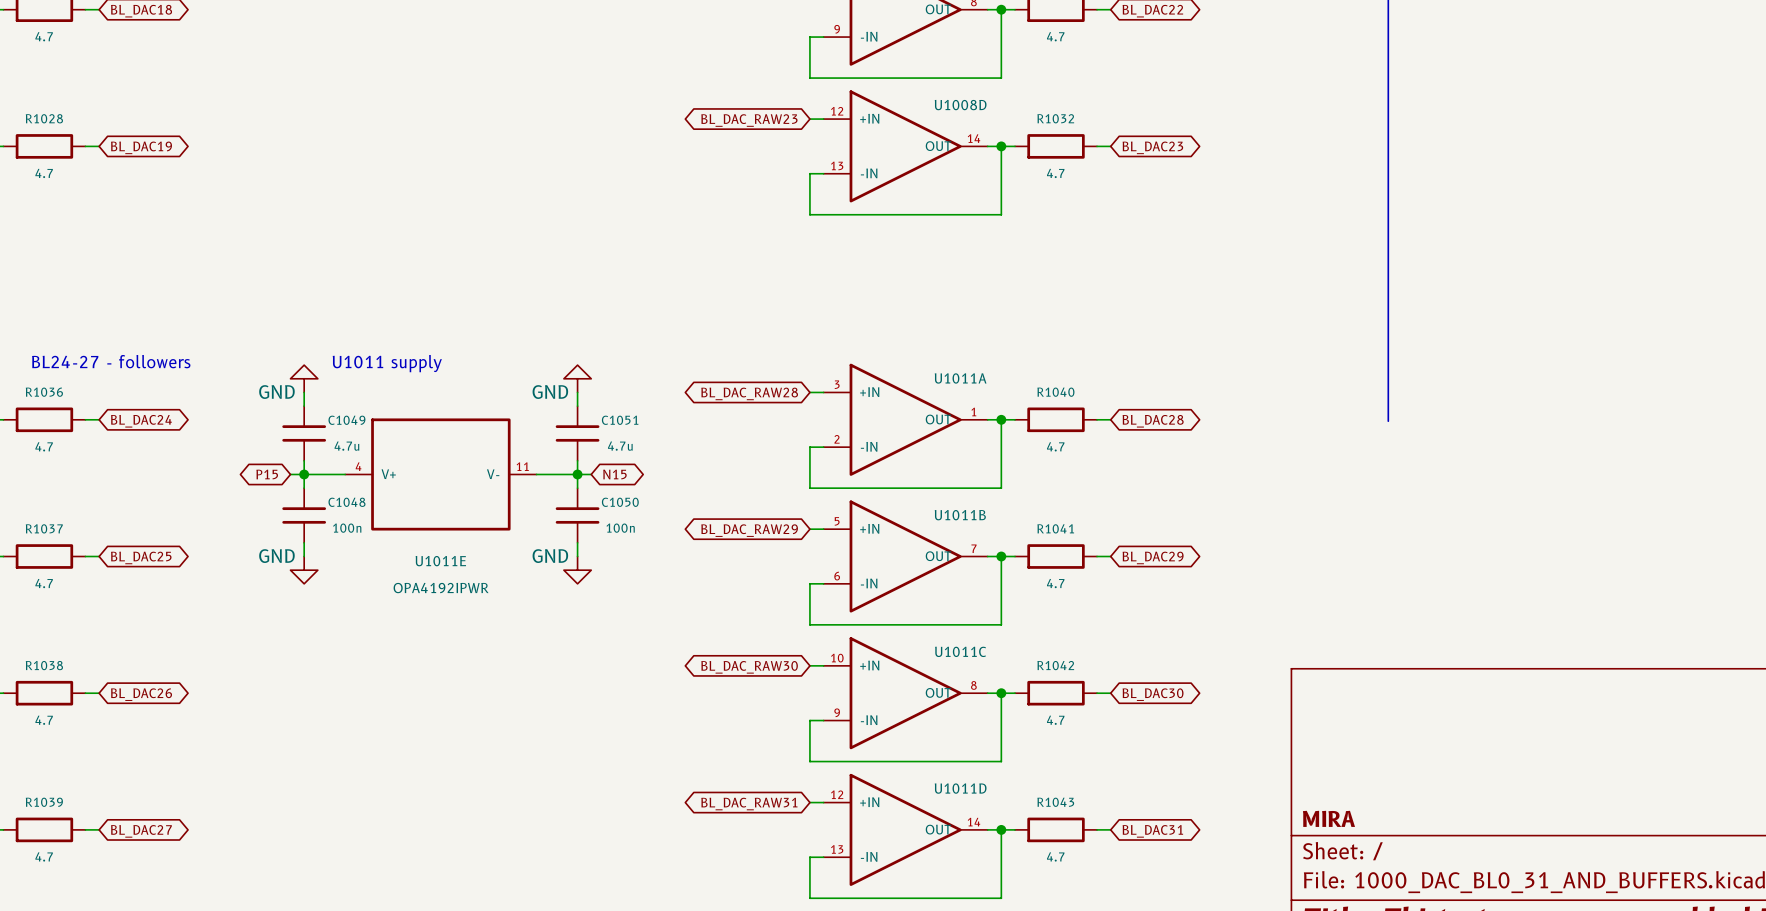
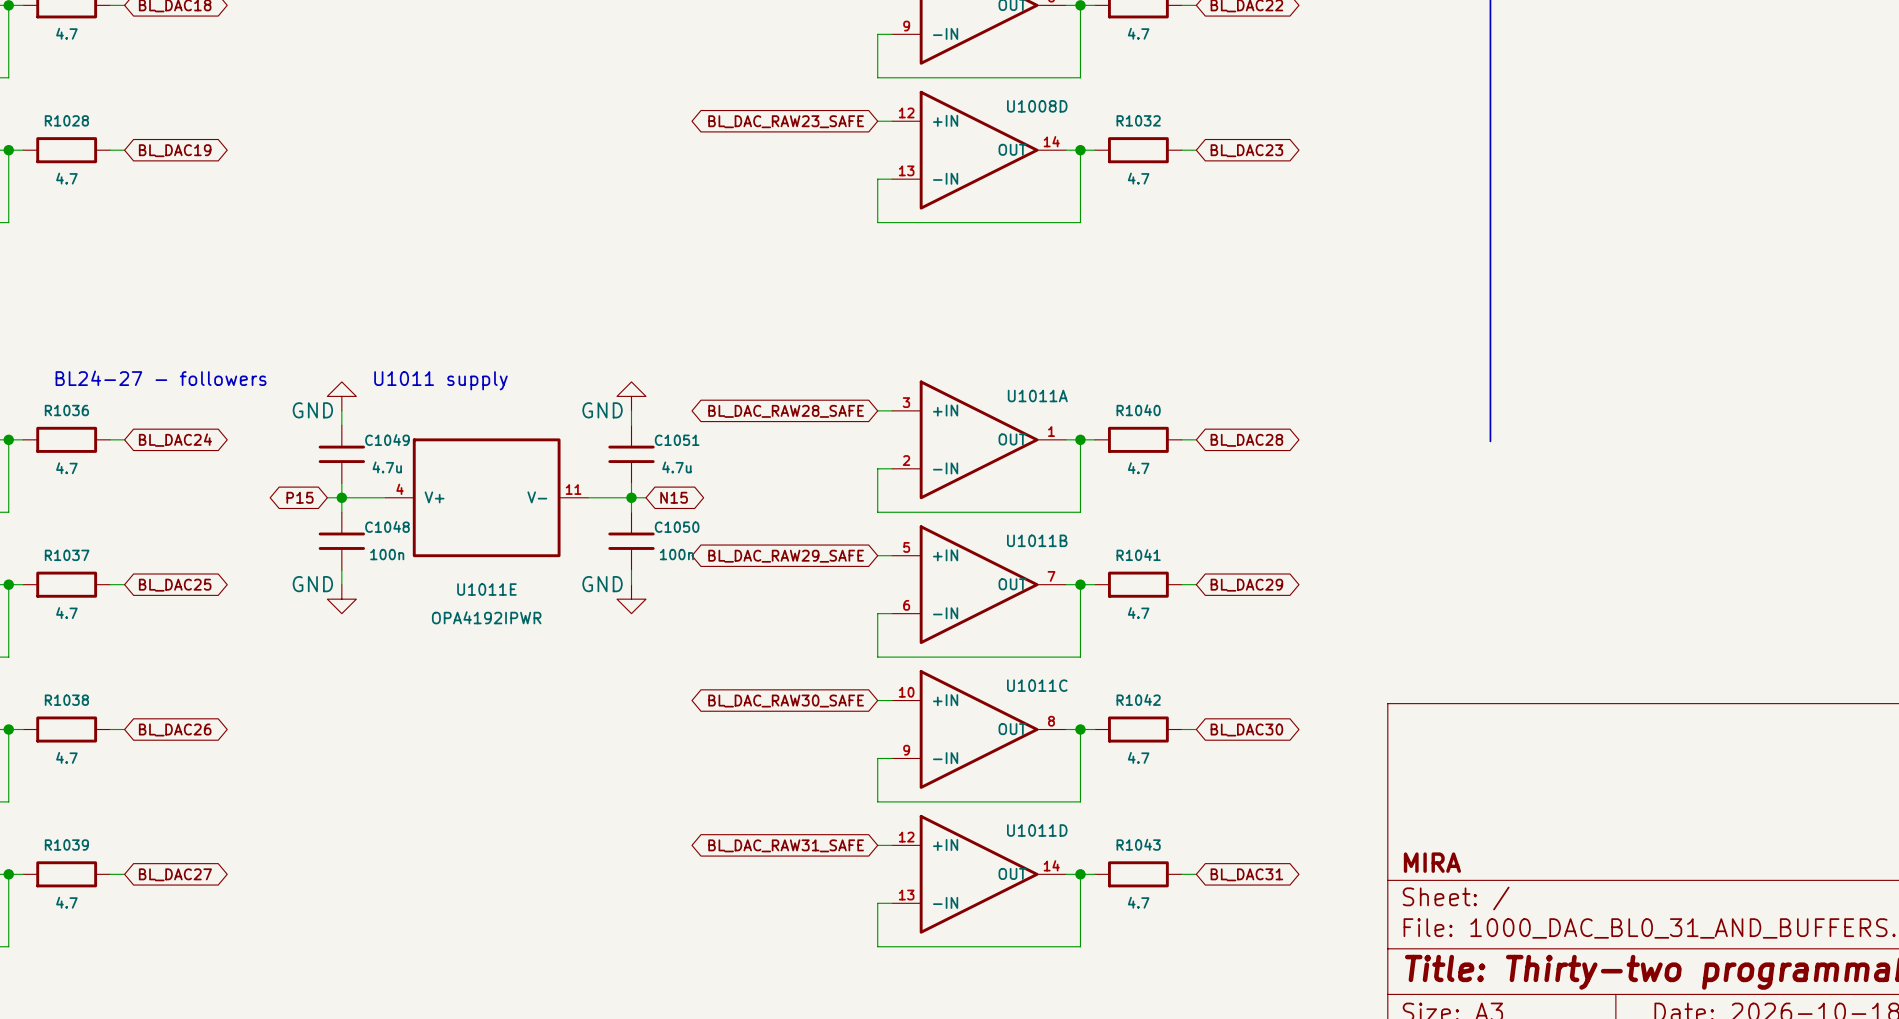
global label: BL_DAC_RAW23 (749, 120) -> BL_DAC_RAW23_SAFE (786, 121)
global label: BL_DAC_RAW28 (749, 393) -> BL_DAC_RAW28_SAFE (786, 411)
global label: BL_DAC_RAW29 (749, 530) -> BL_DAC_RAW29_SAFE (786, 556)
global label: BL_DAC_RAW30 (749, 667) -> BL_DAC_RAW30_SAFE (786, 701)
global label: BL_DAC_RAW31 (749, 804) -> BL_DAC_RAW31_SAFE (786, 845)

